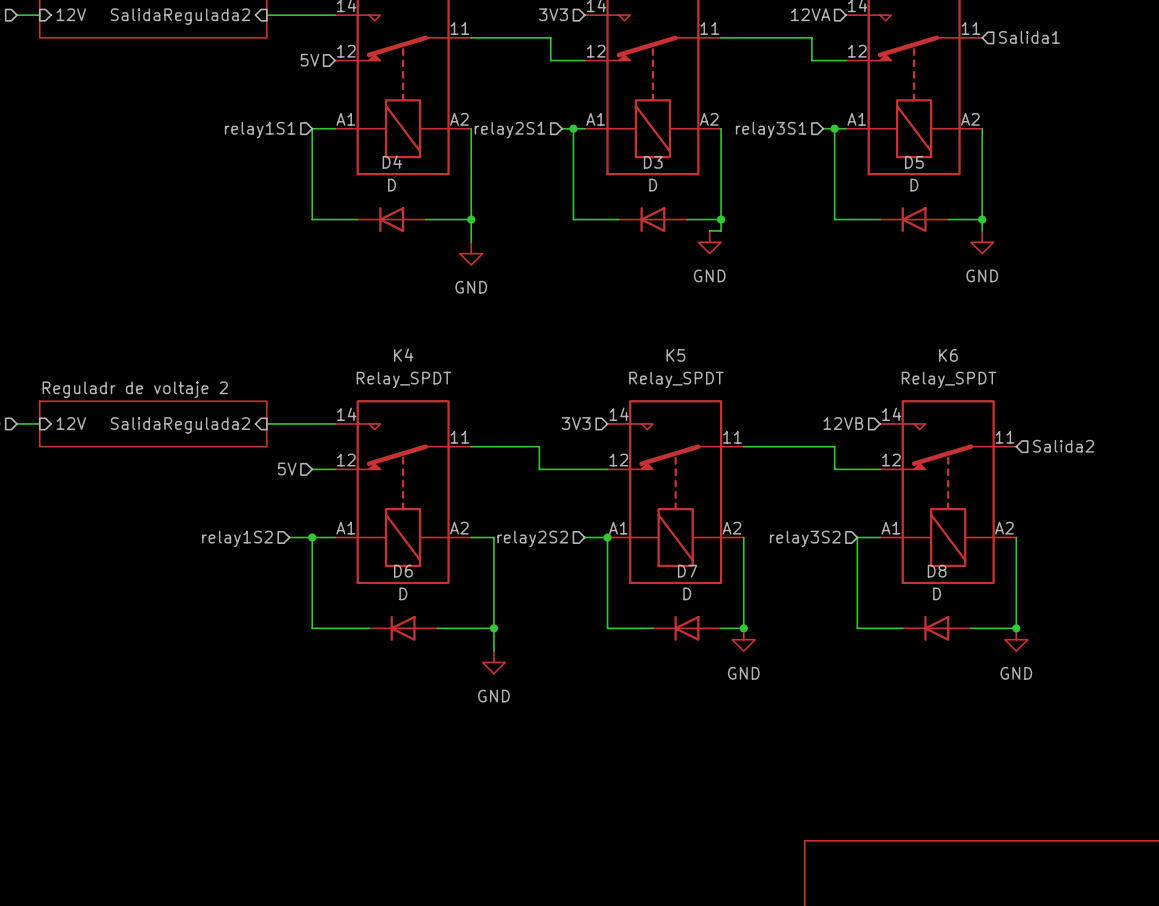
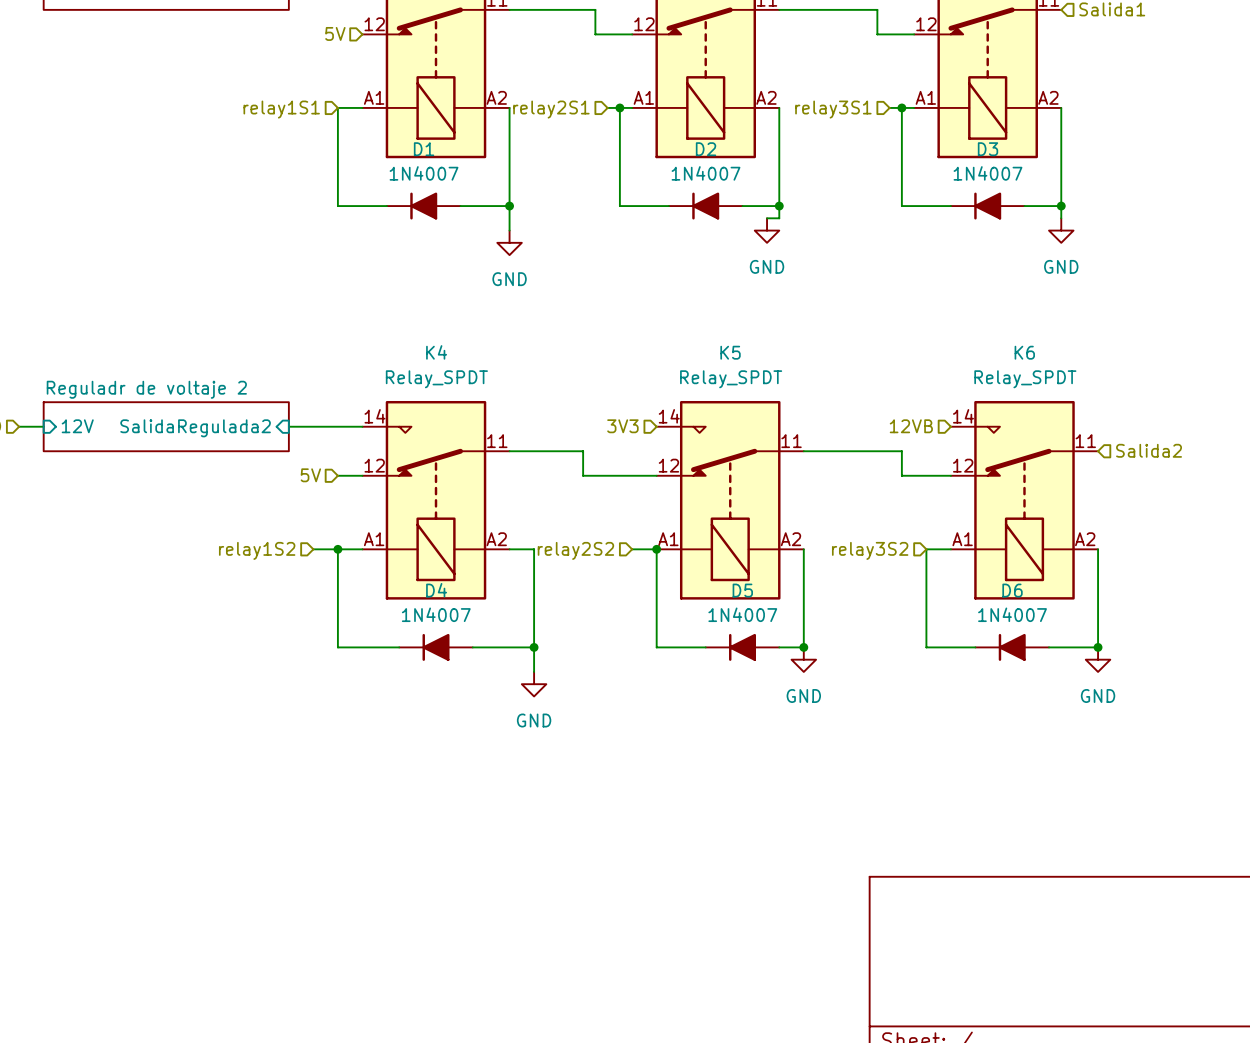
D4 value: D (392, 185) -> 1N4007 (436, 614)
D3 value: D (653, 185) -> 1N4007 (988, 173)
D5 value: D (914, 185) -> 1N4007 (742, 614)
D4 symbol: [357, 207, 426, 233] -> [399, 633, 473, 661]
D3 symbol: [618, 207, 688, 233] -> [950, 192, 1025, 220]
D5 symbol: [880, 207, 949, 233] -> [705, 633, 780, 661]
D1: none -> 1N4007 (423, 206)
D2: none -> 1N4007 (705, 206)
D6 value: D (403, 593) -> 1N4007 (1012, 614)
D6 symbol: [369, 615, 438, 641] -> [975, 633, 1050, 661]
D7: D (687, 628) -> none
D8: D (936, 628) -> none

